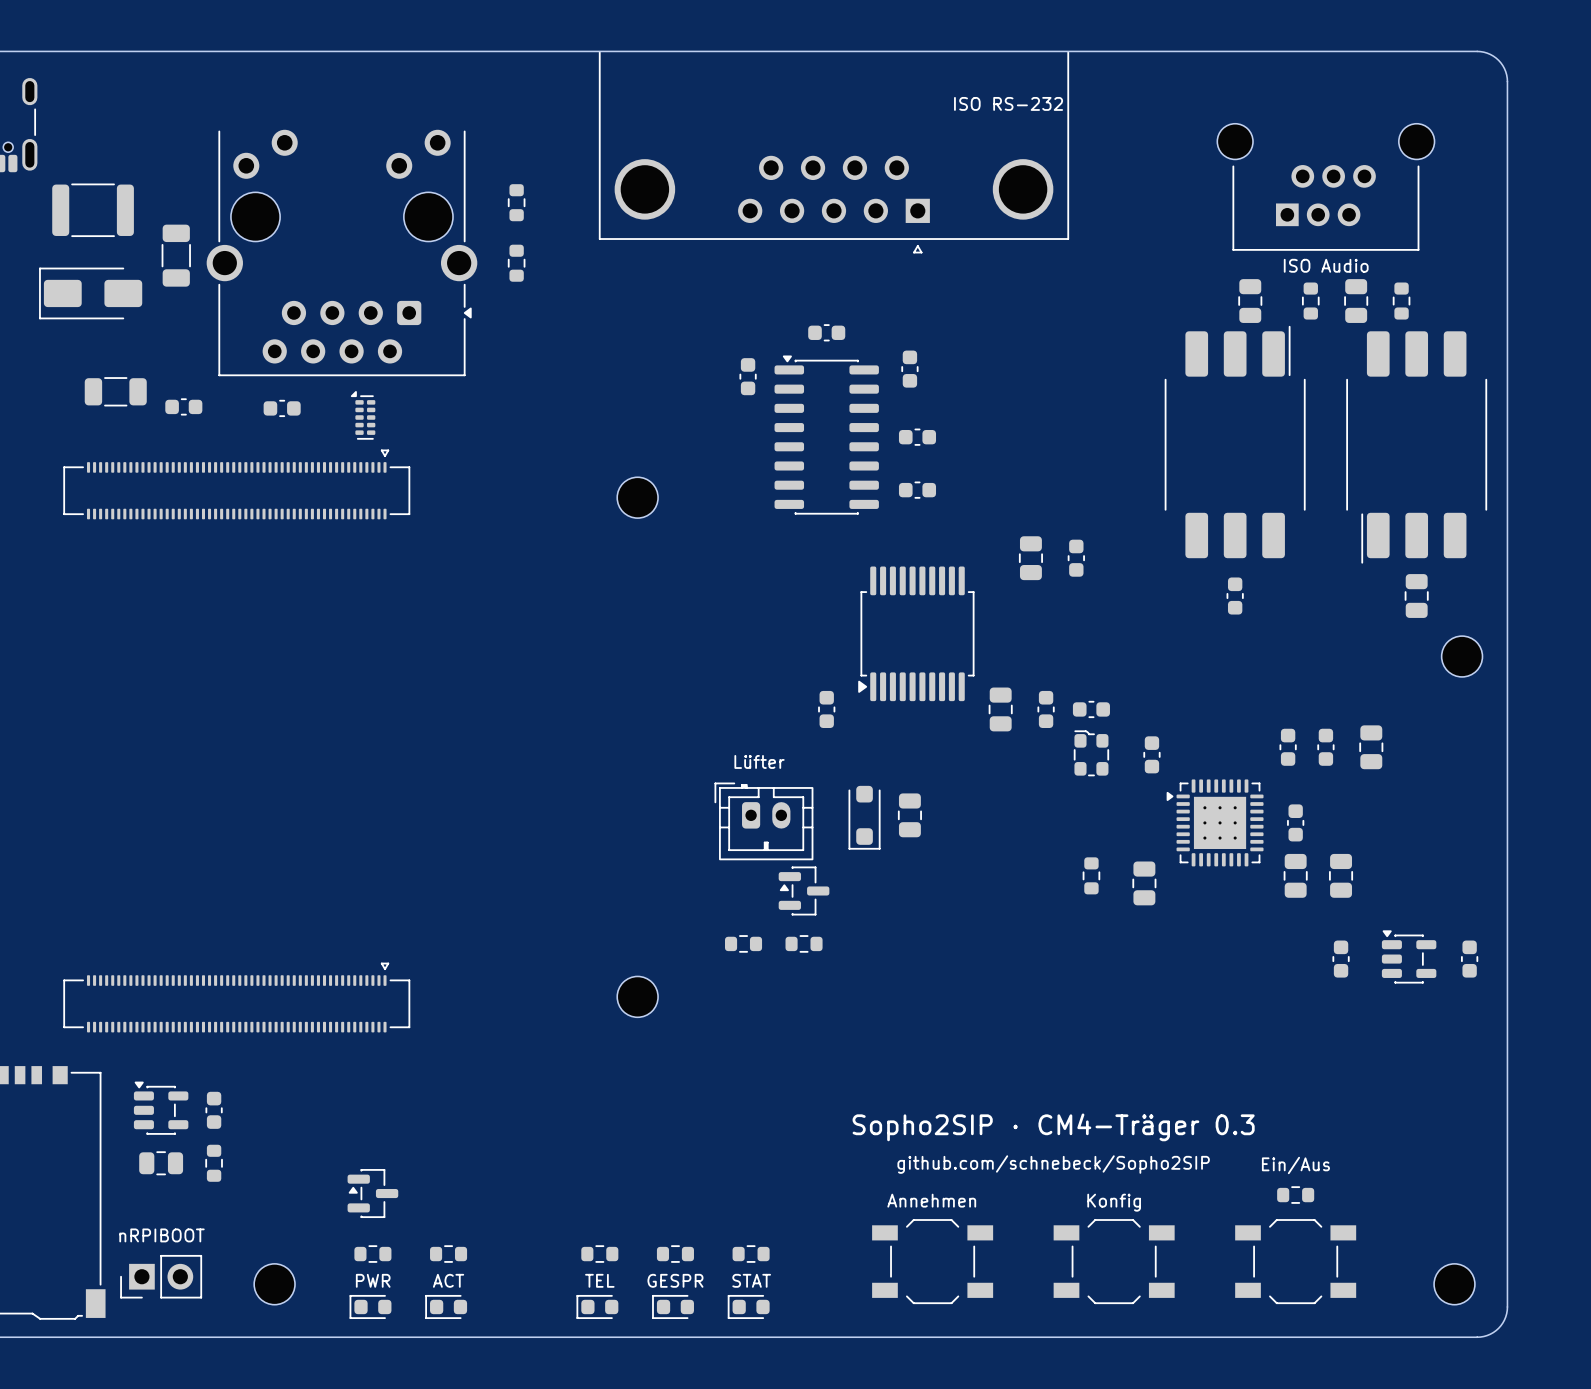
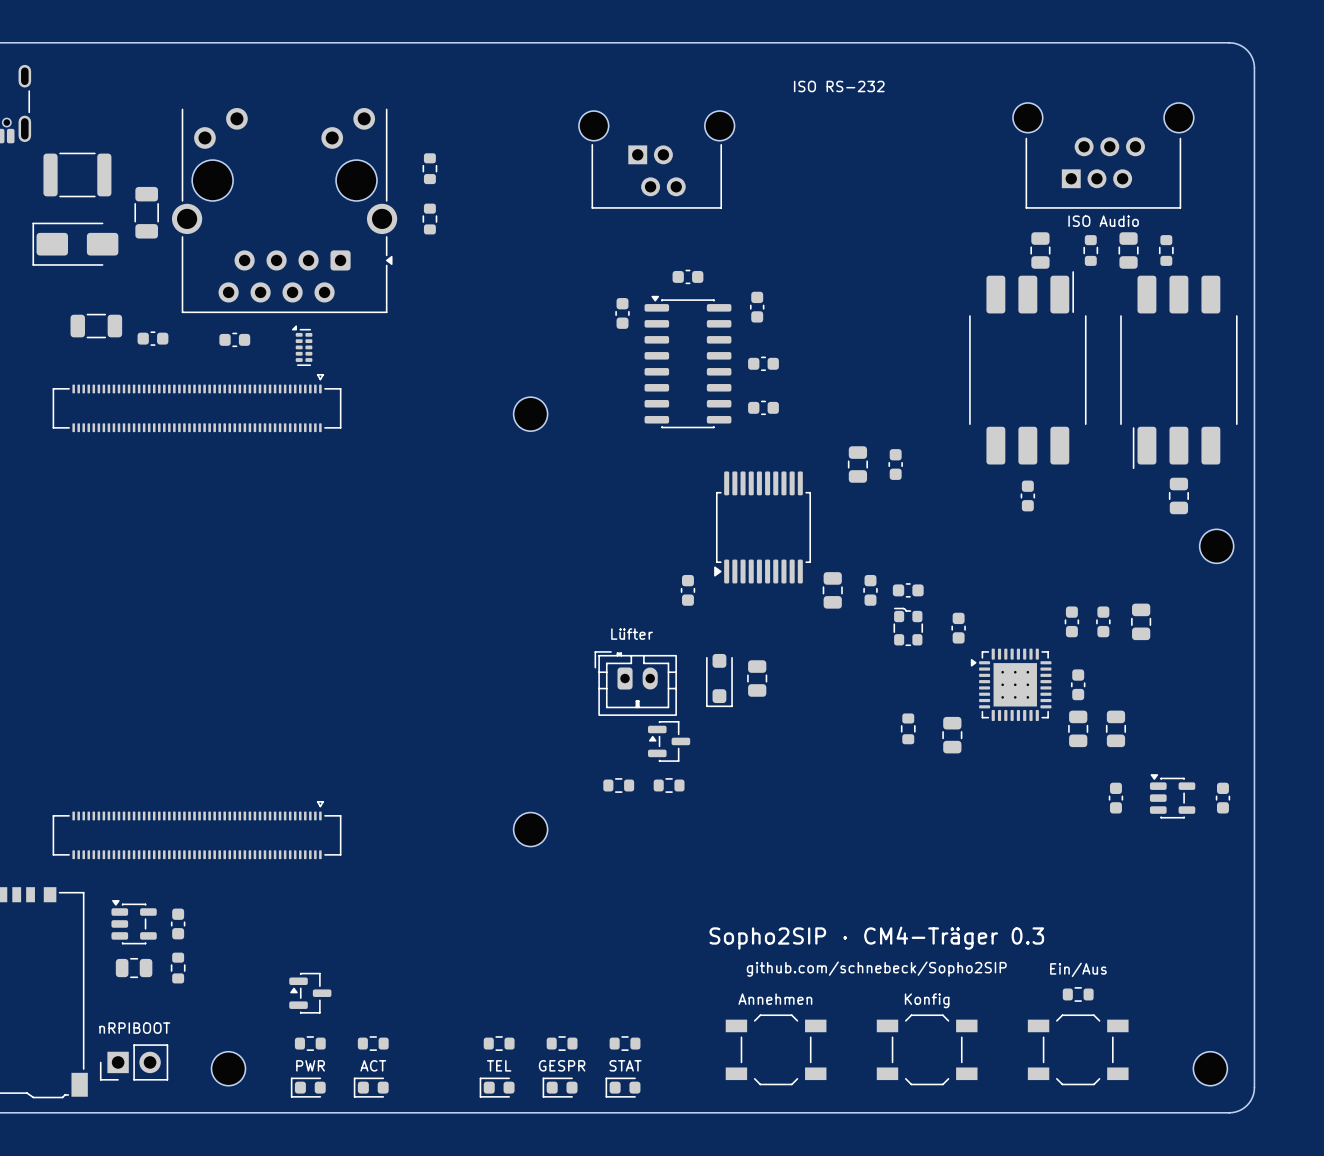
part: (833, 152) -> none
part: none -> (656, 159)

